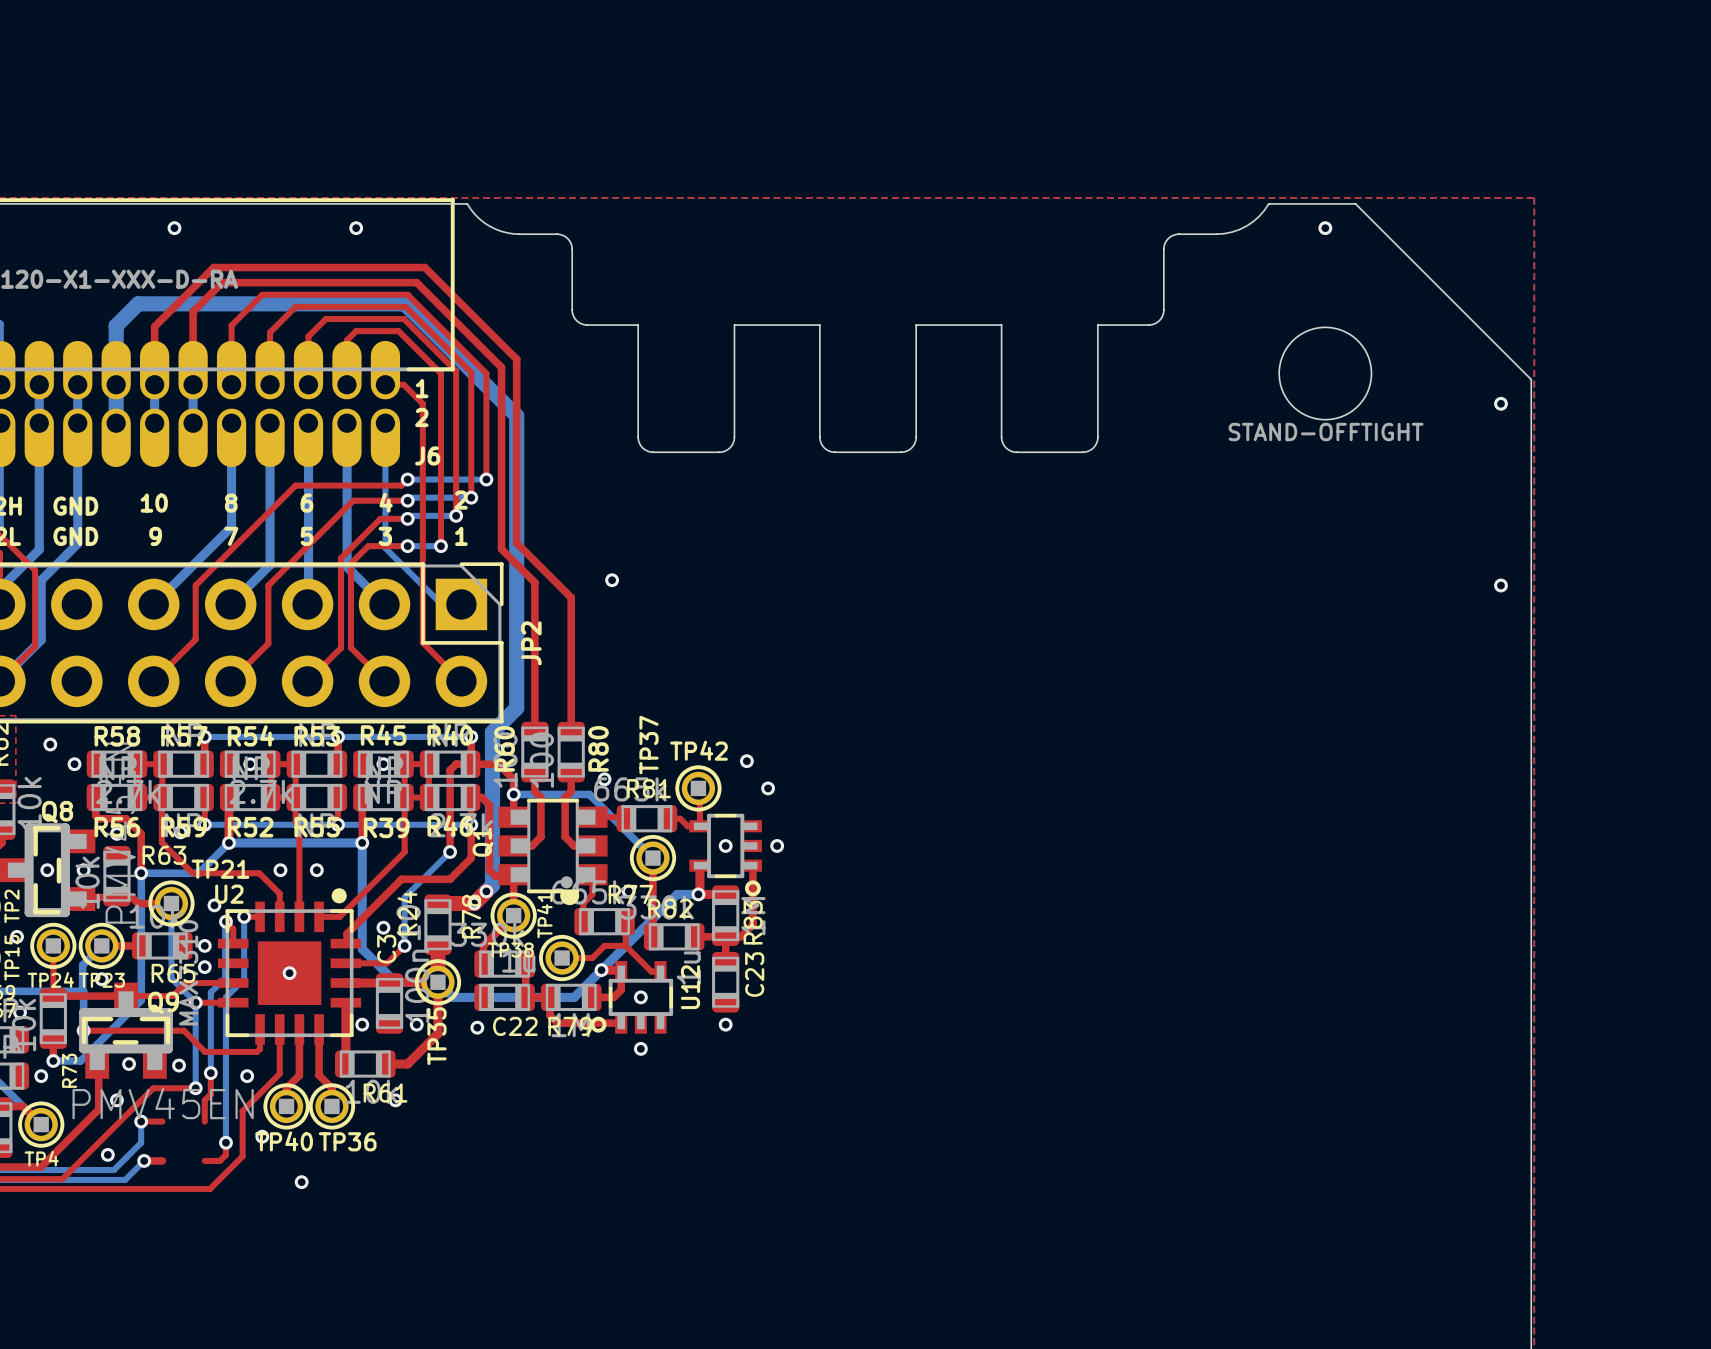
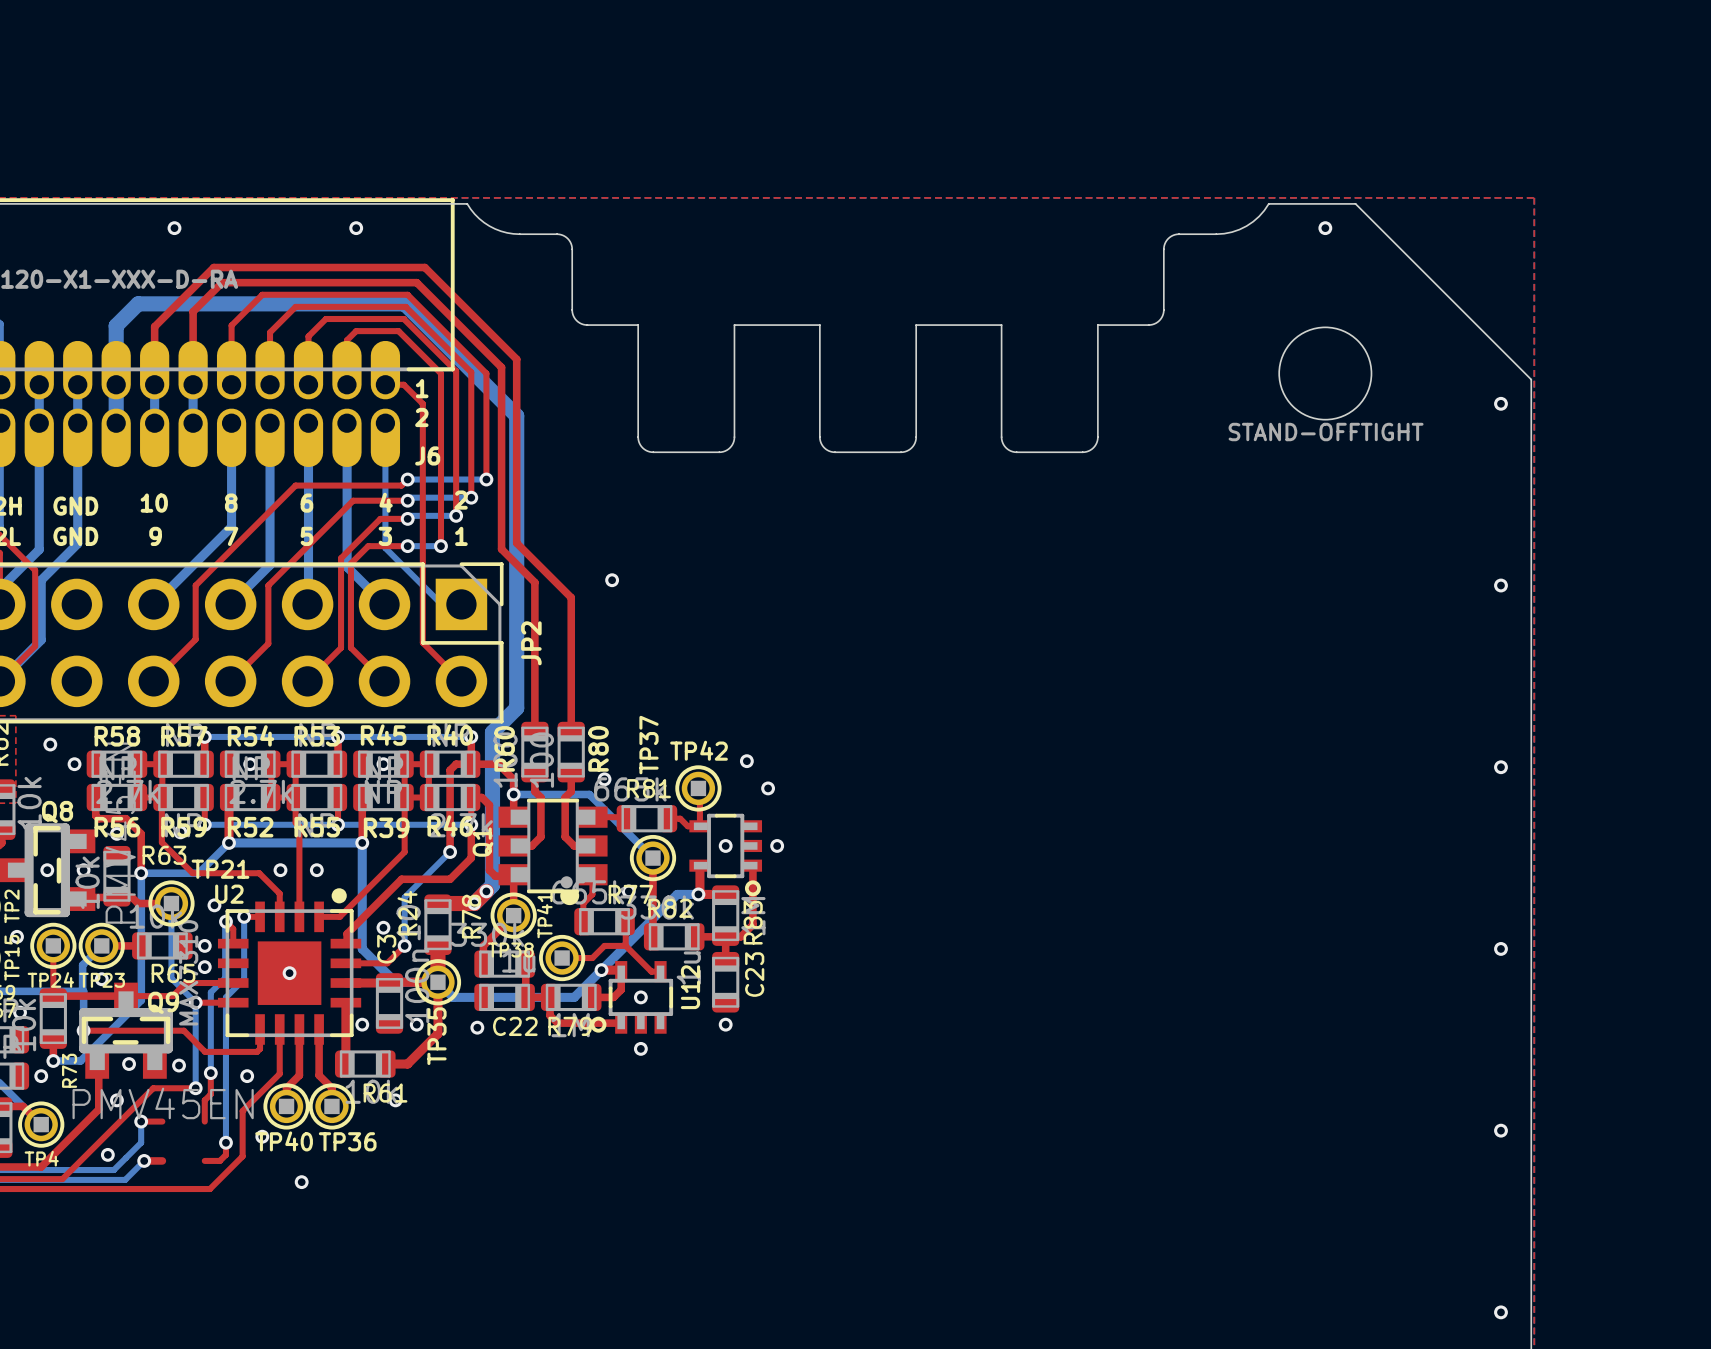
via: none -> (1500, 767)
via: none -> (1500, 948)
via: none -> (1500, 1130)
via: none -> (1500, 1312)

